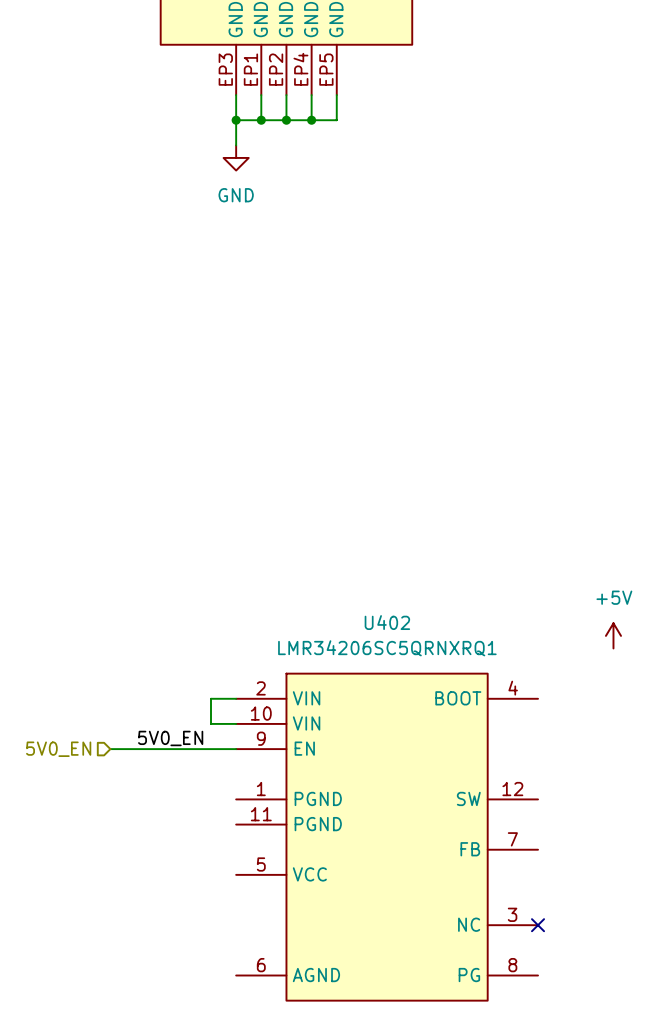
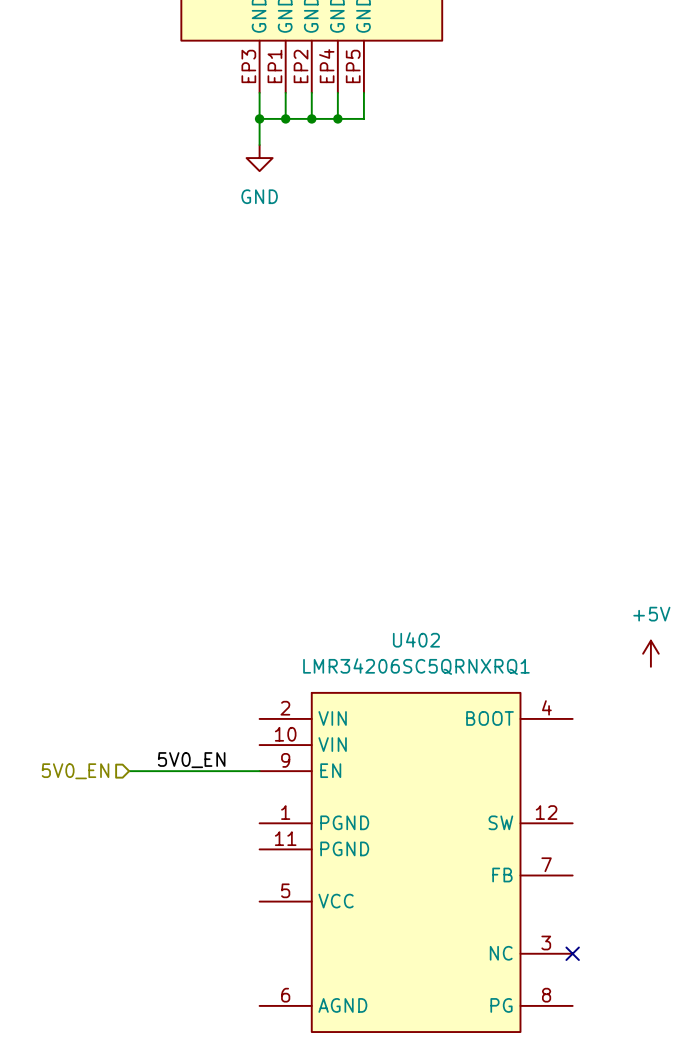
wire: (236, 698) (210, 698) (210, 723) (236, 723) -> none

